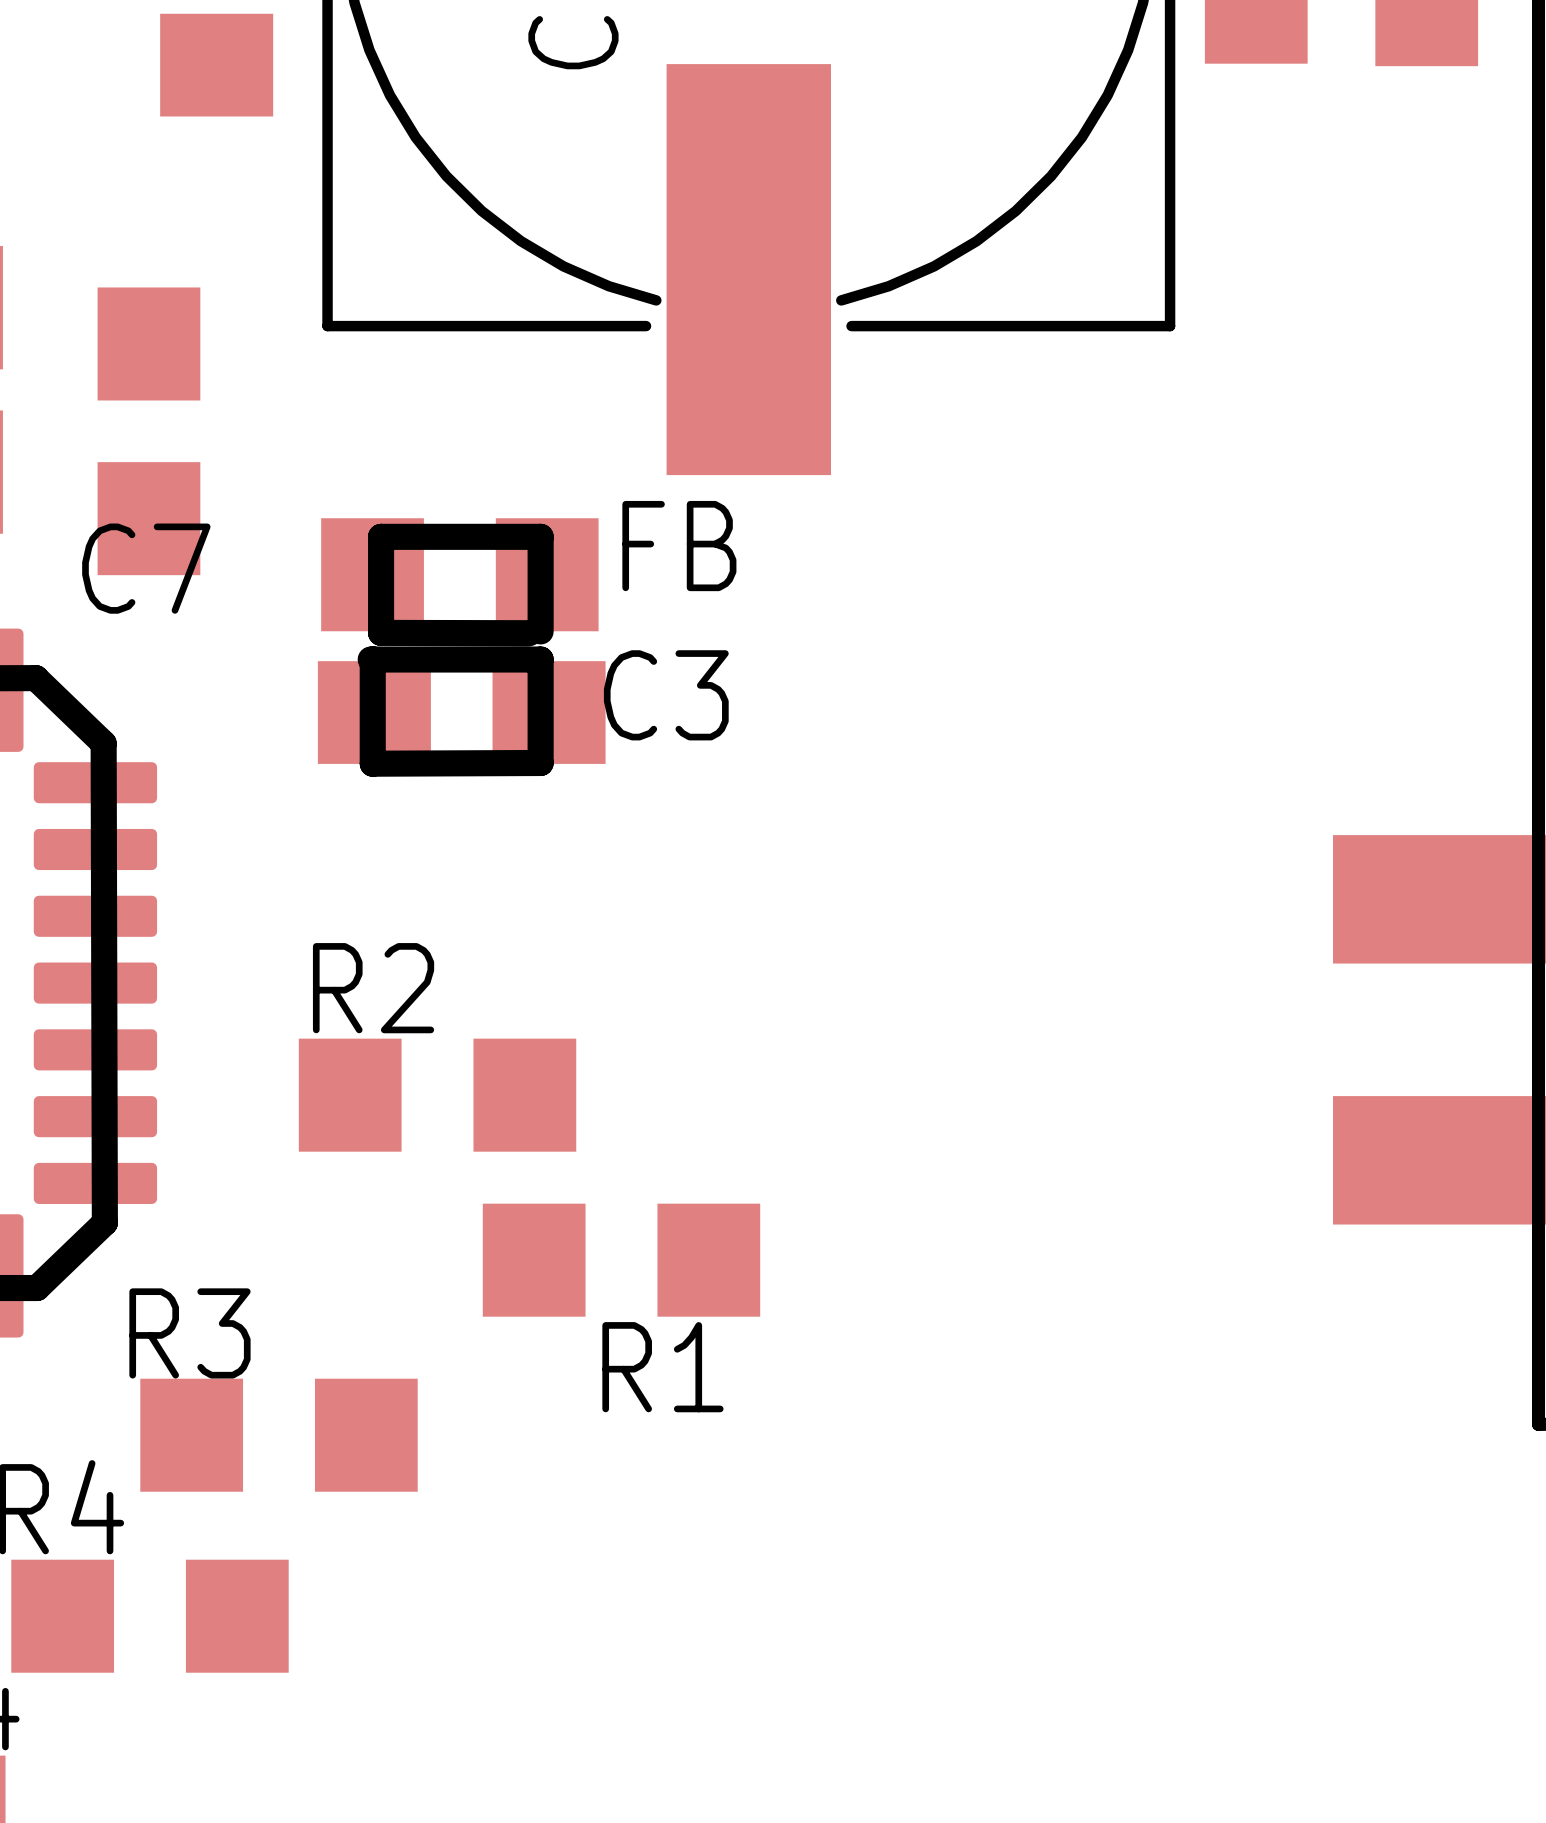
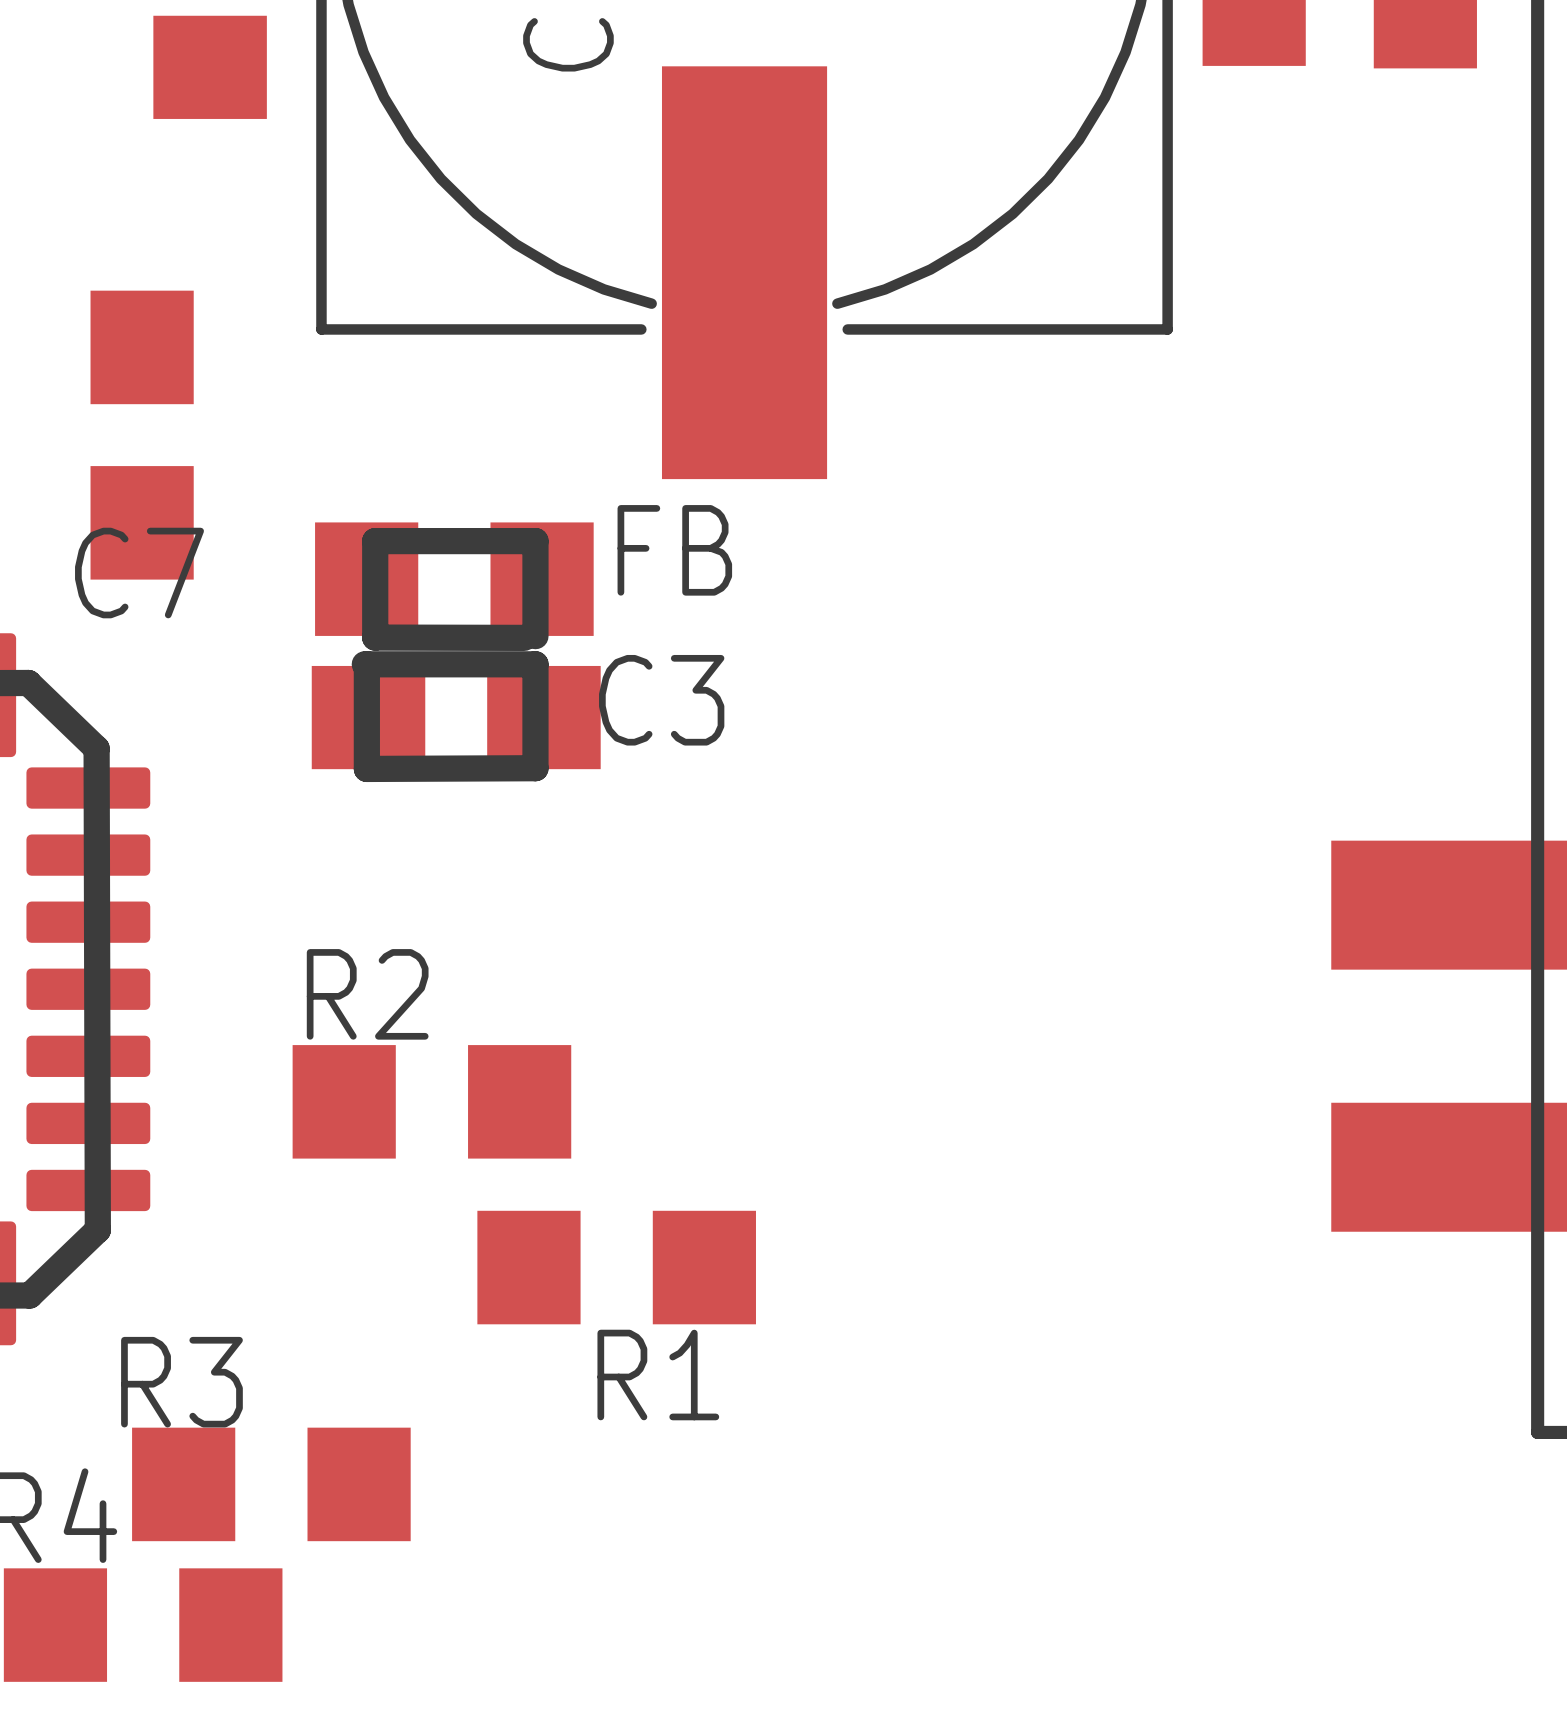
R3 position: (279, 1435) -> (271, 1484)

